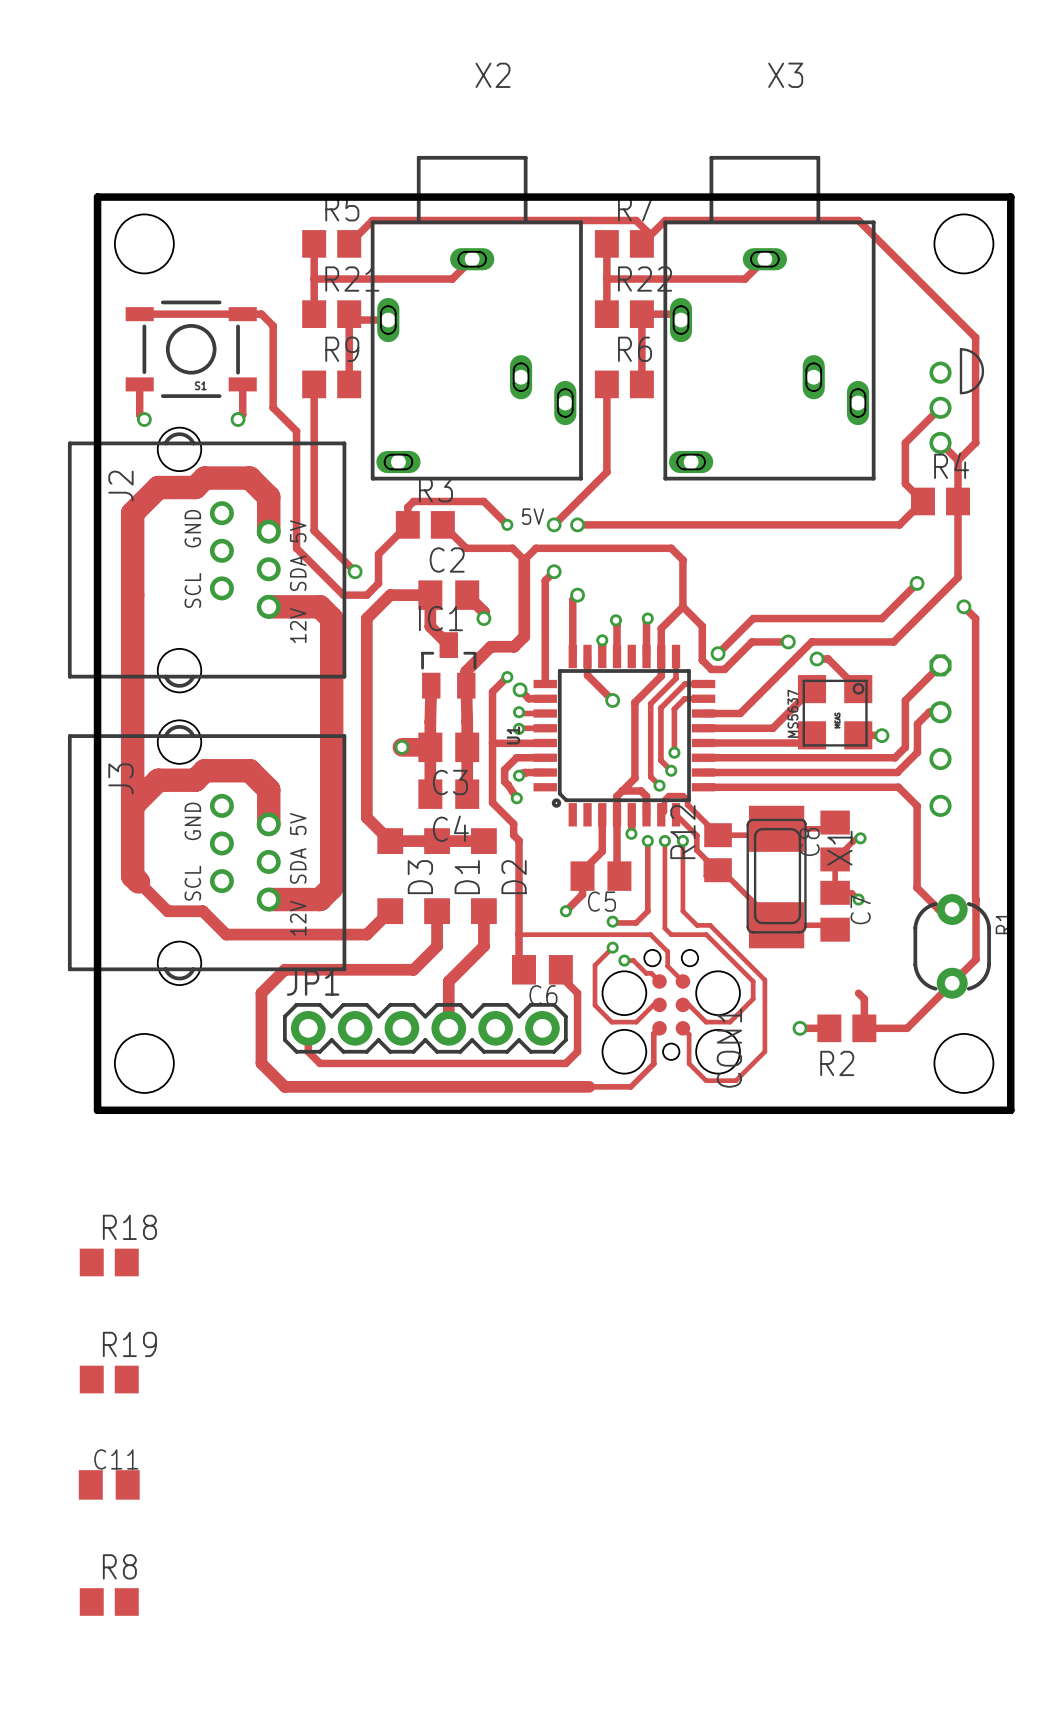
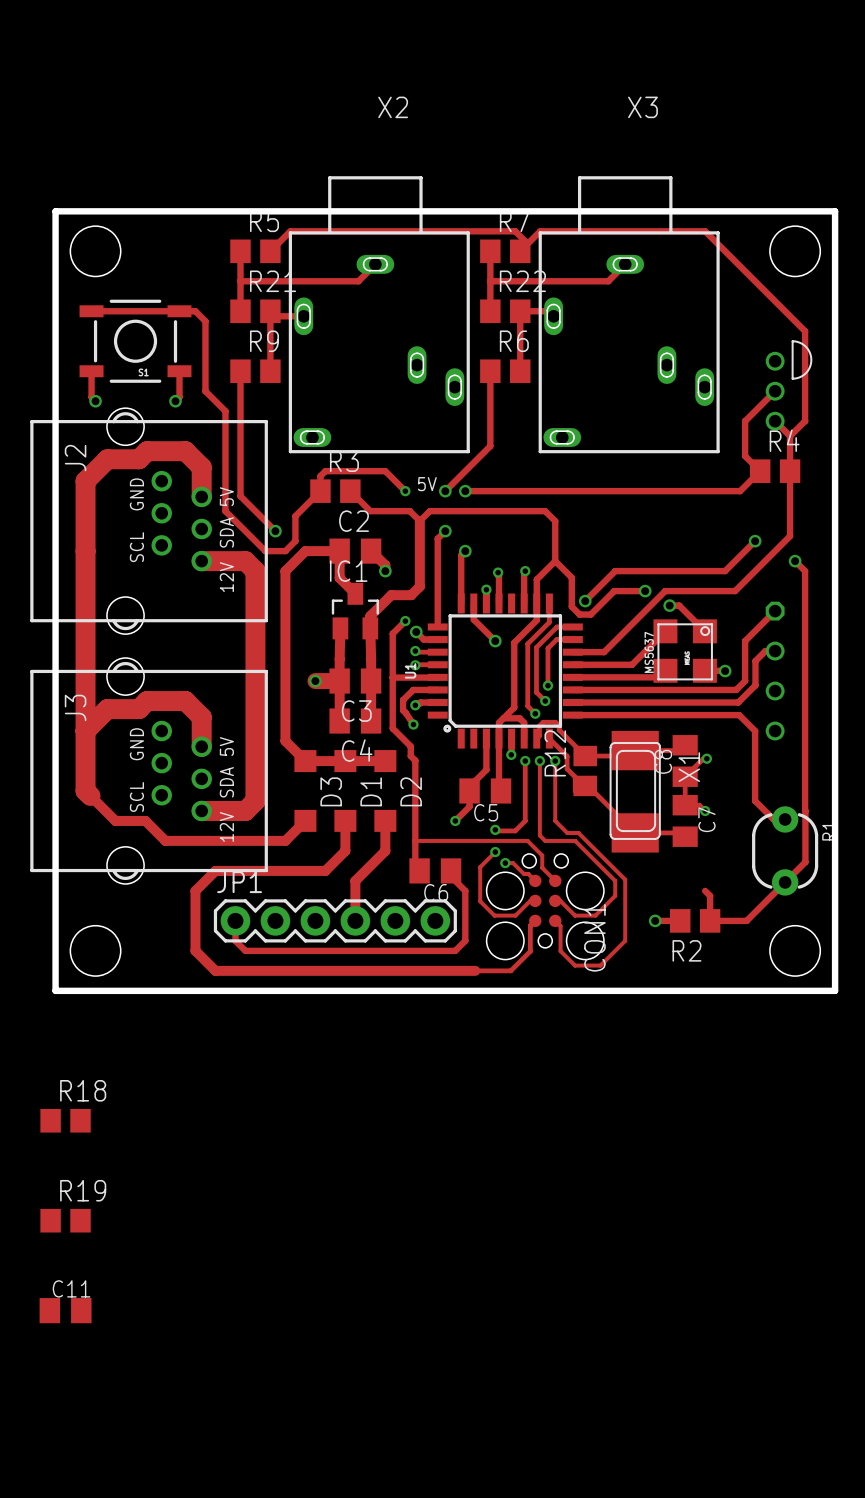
R8: (109, 1601) -> none

